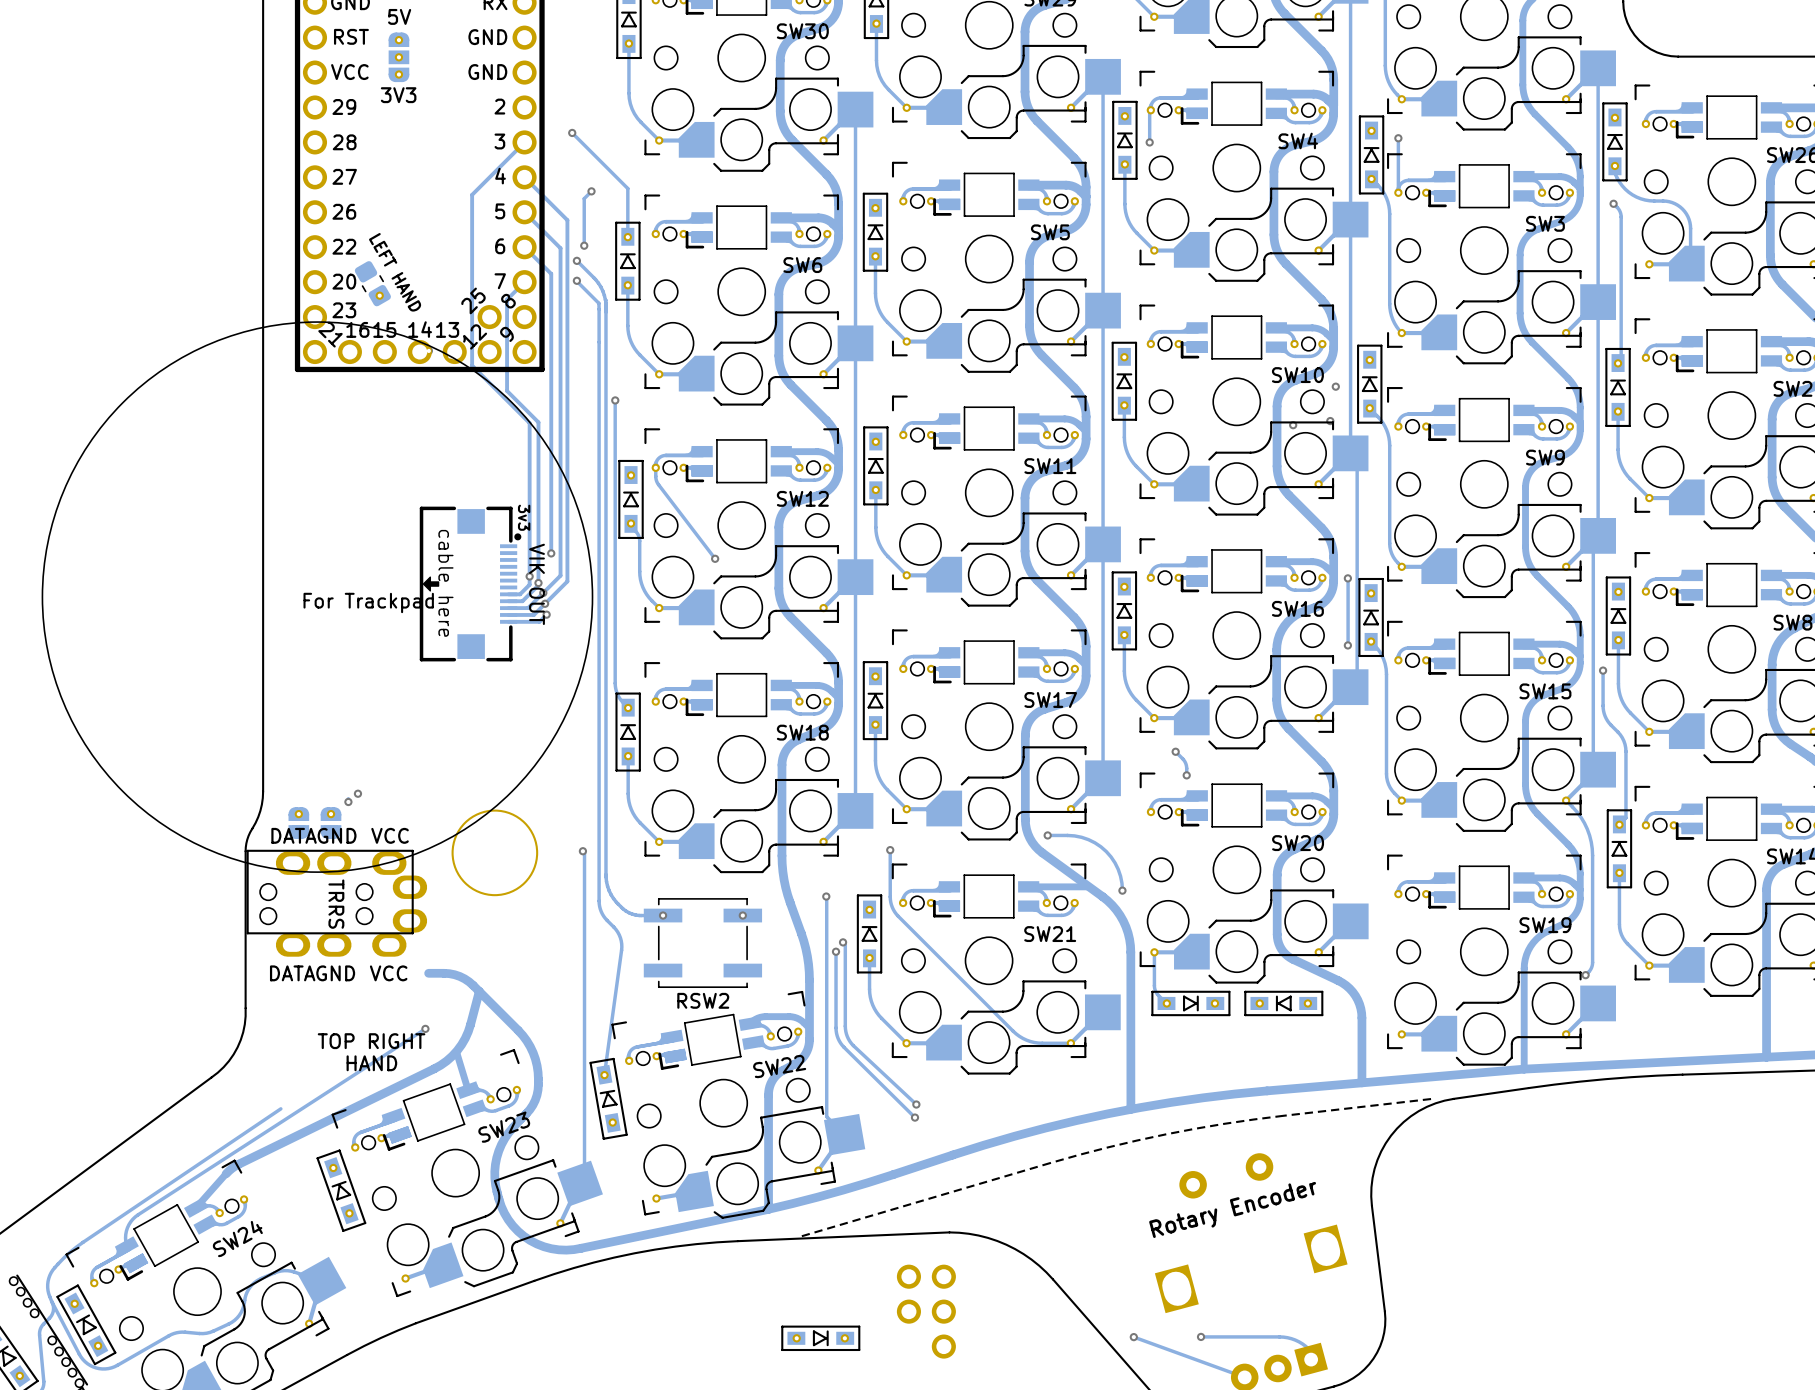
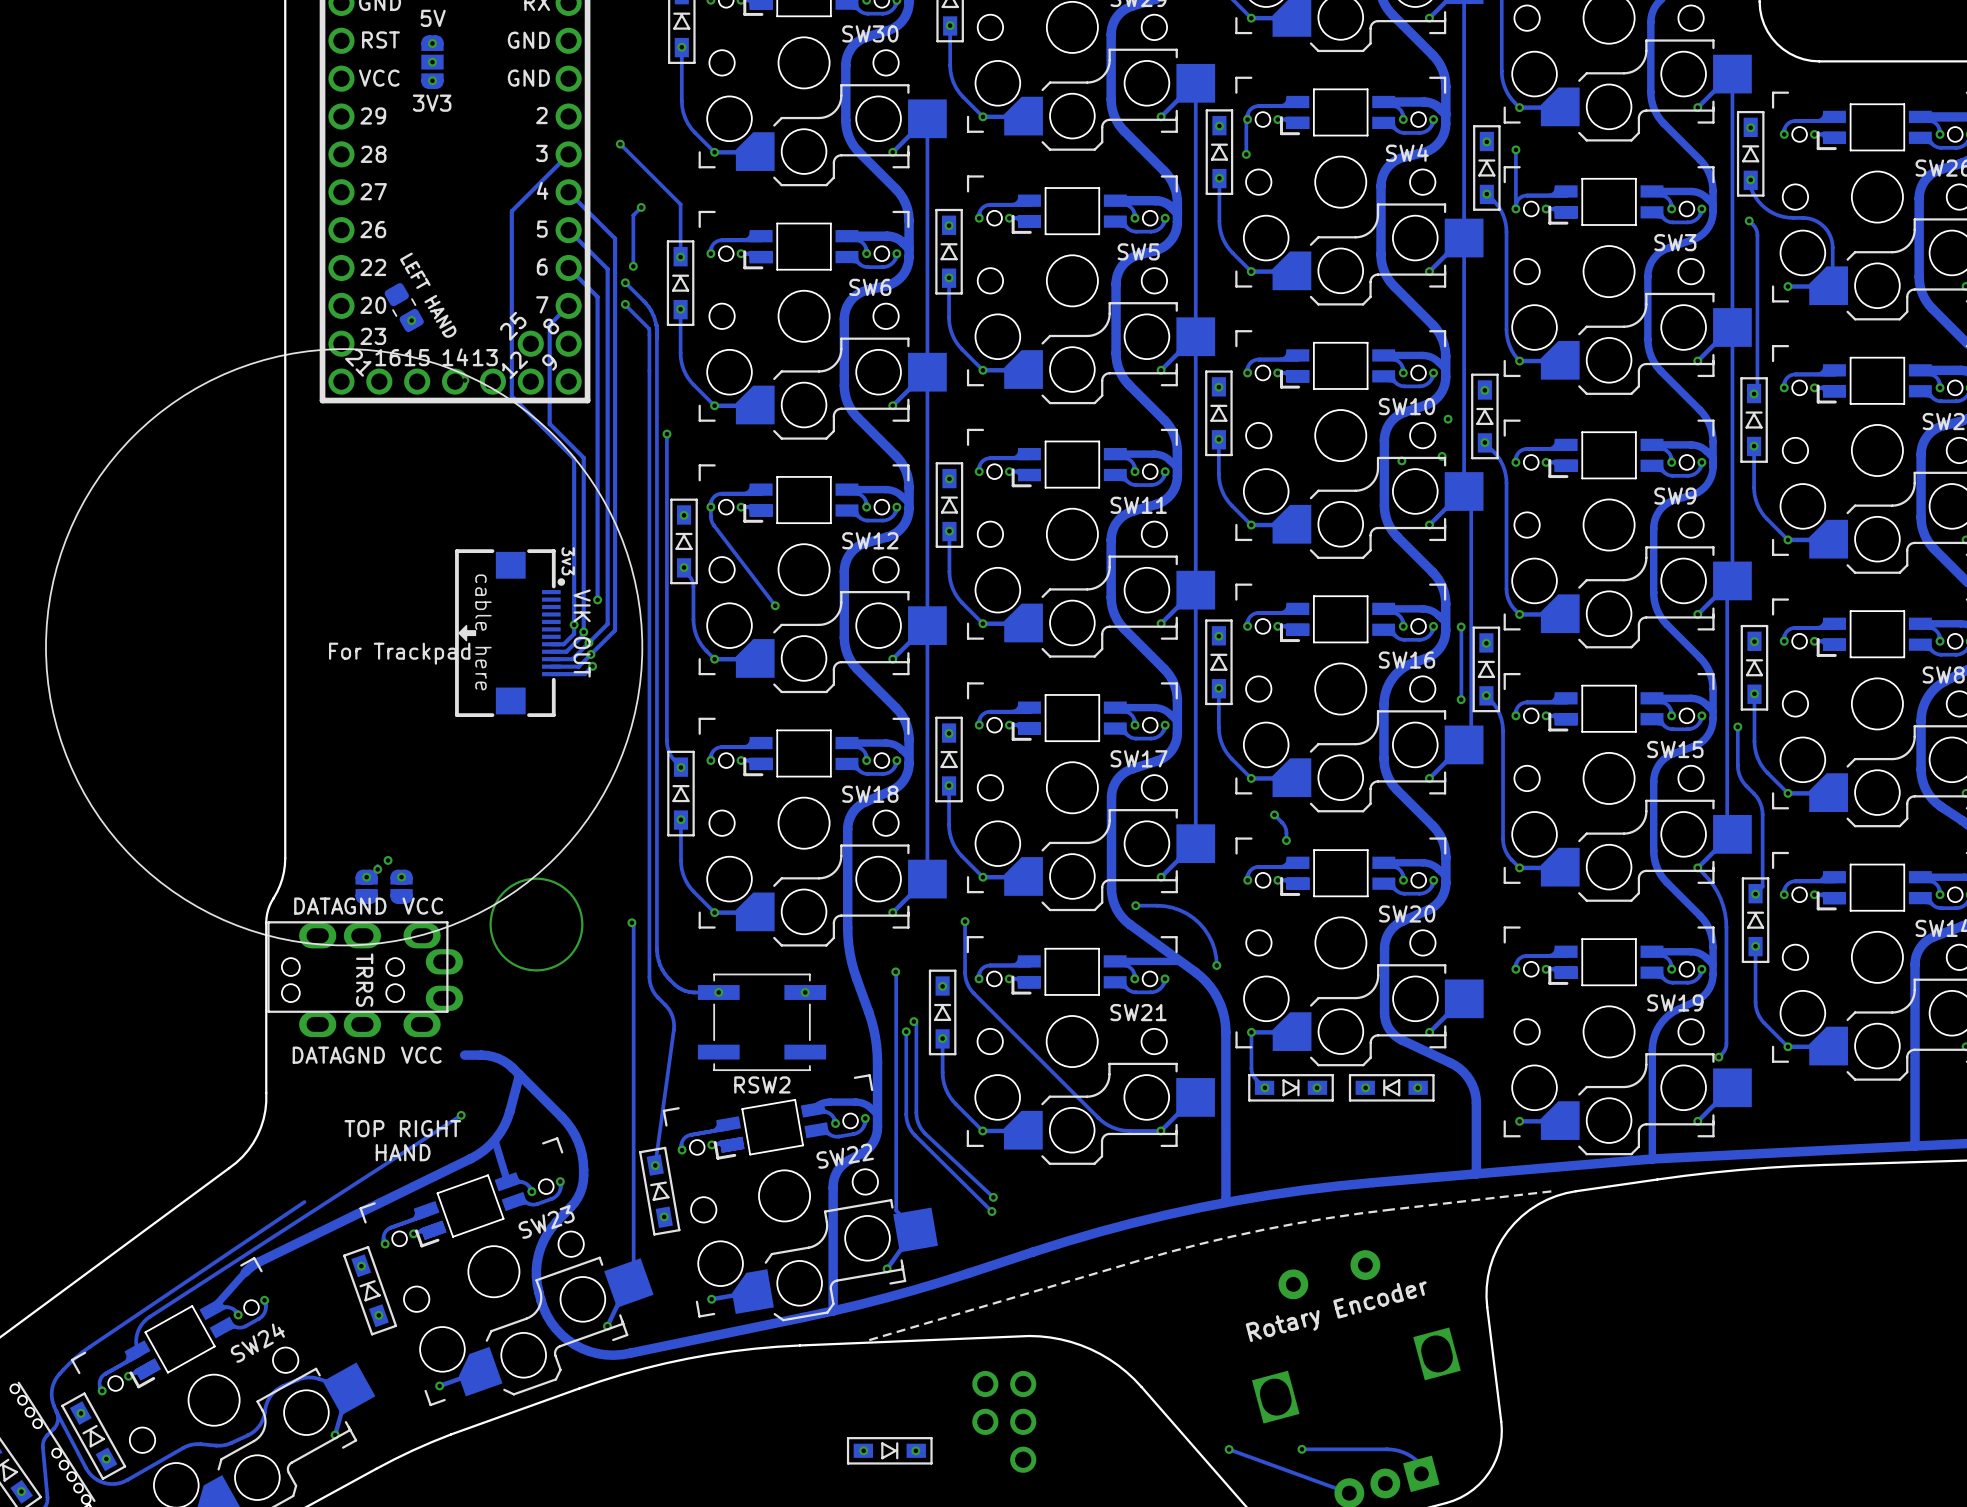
part position: (314, 823) -> (384, 886)

